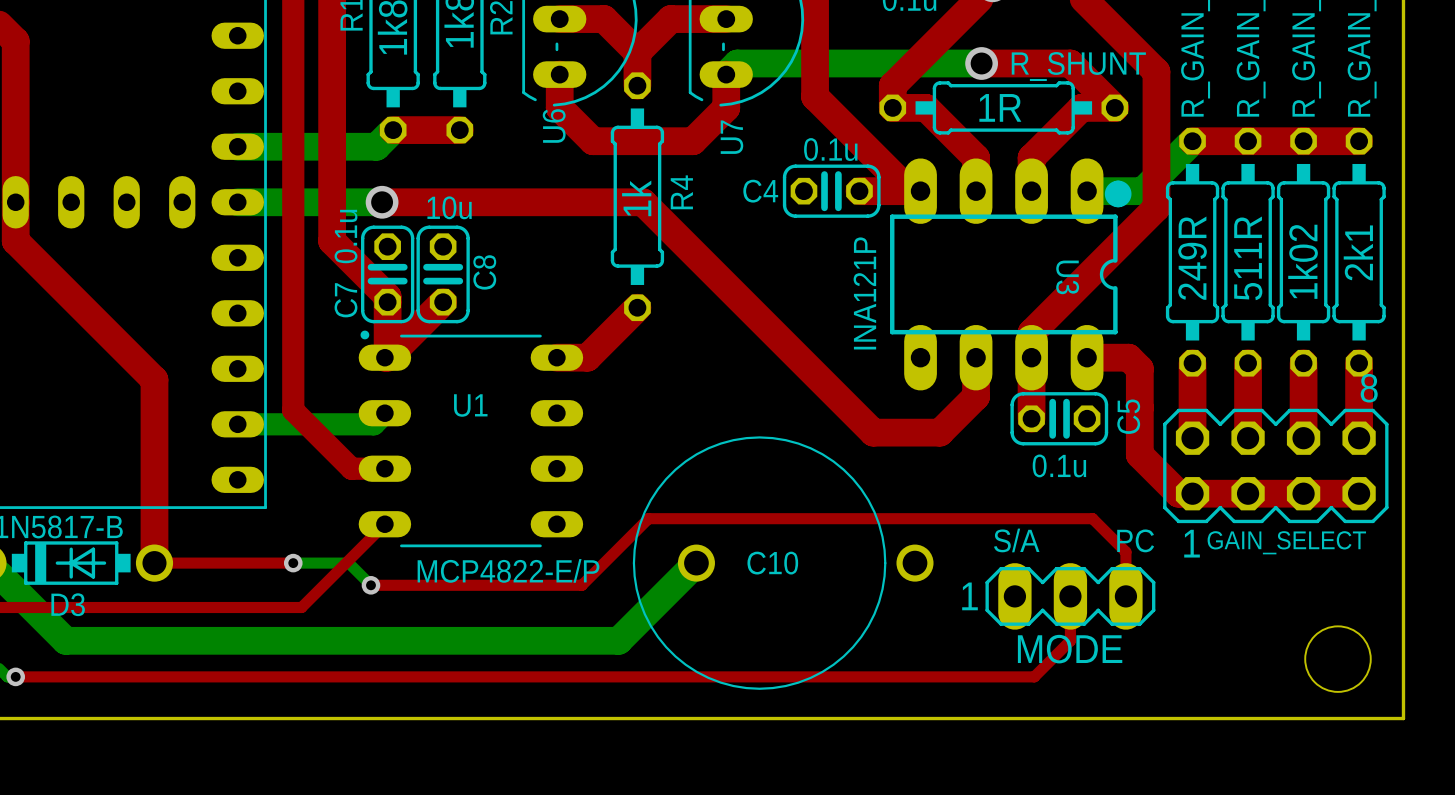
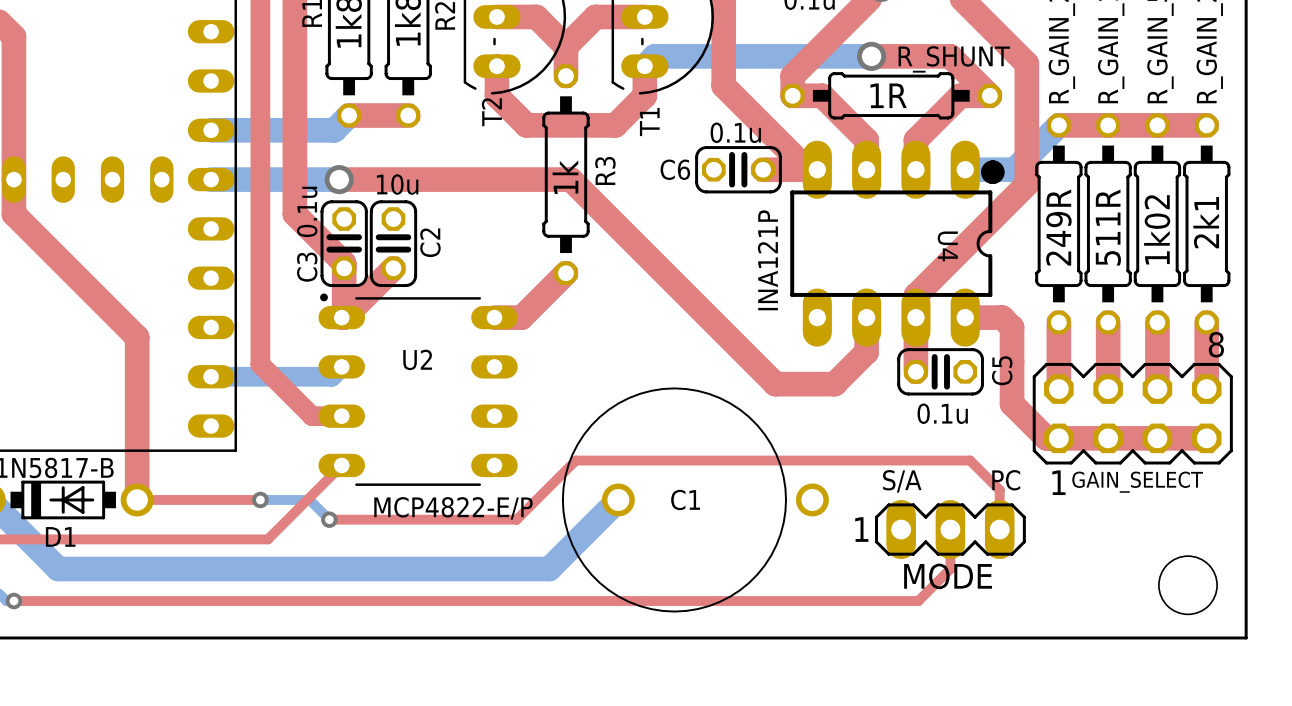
U6 name: U6 (554, 125) -> T2 (491, 112)
U7 name: U7 (731, 137) -> T1 (649, 122)
C4 name: C4 (760, 191) -> C6 (675, 169)
R4 name: R4 (681, 192) -> R3 (605, 170)
C8 name: C8 (484, 272) -> C2 (430, 242)
U3 name: U3 (1067, 277) -> U4 (947, 246)
C7 name: C7 (345, 300) -> C3 (307, 267)
U1 name: U1 (470, 405) -> U2 (417, 359)
C10 name: C10 (772, 563) -> C1 (685, 499)
D3 name: D3 (68, 604) -> D1 (60, 536)

